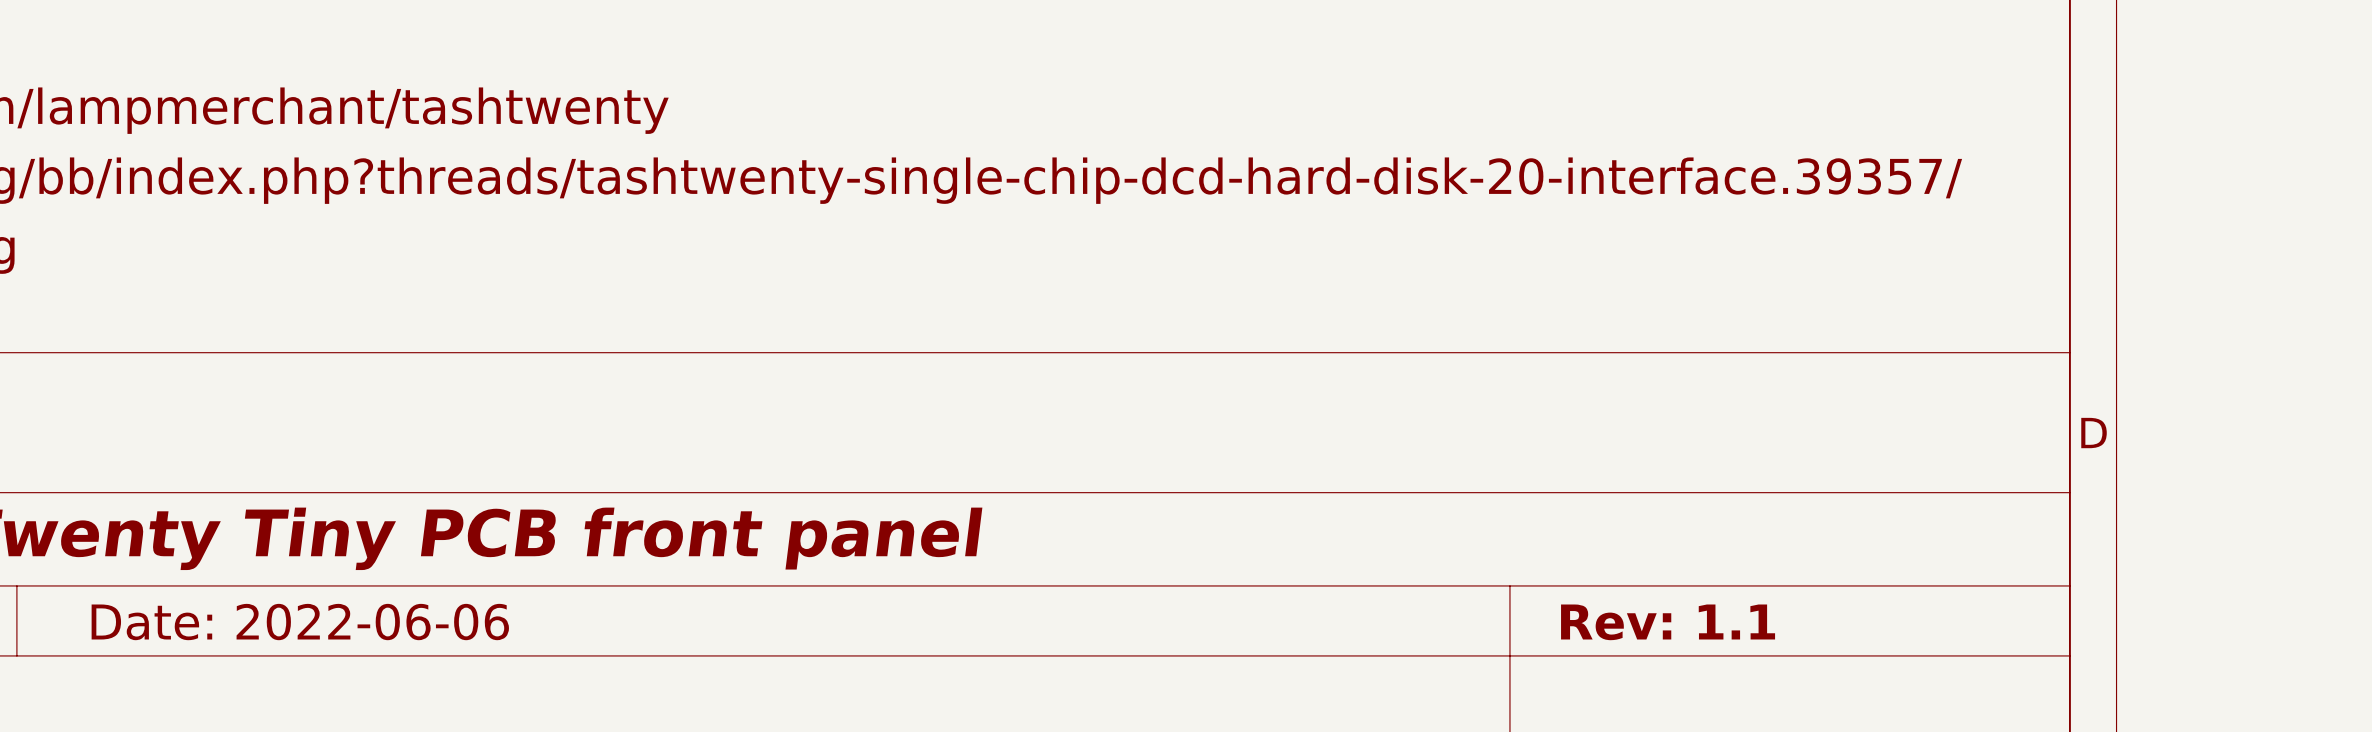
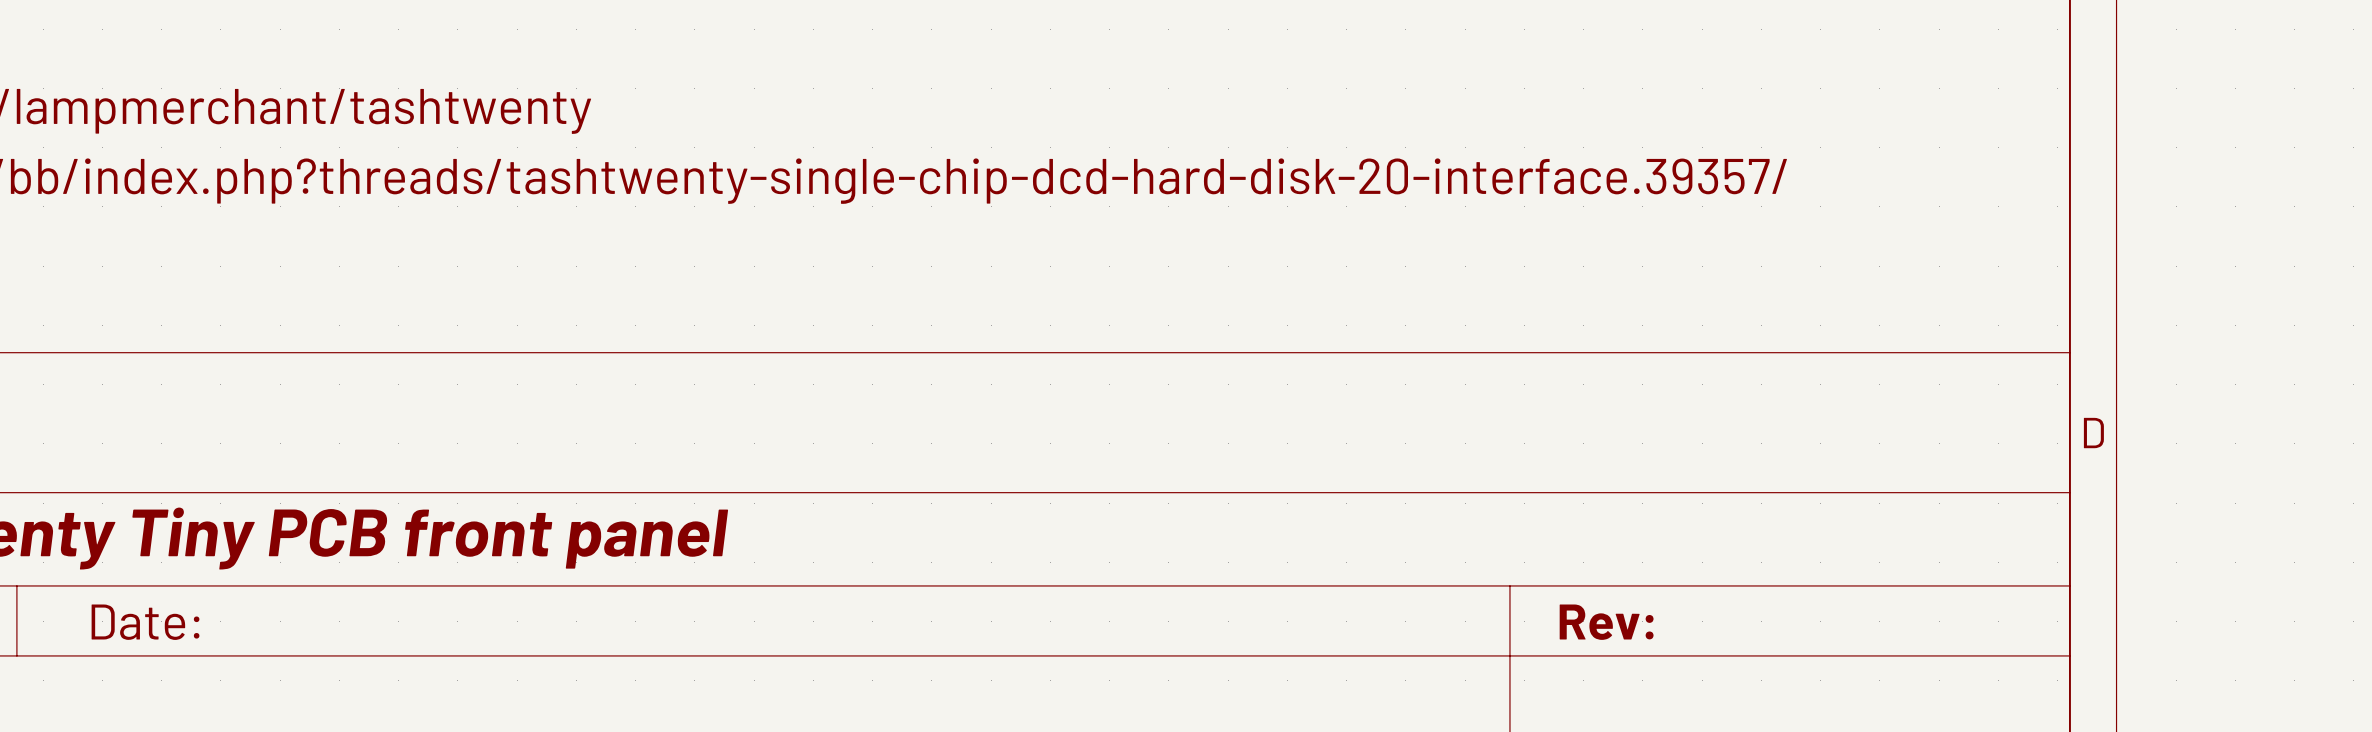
title block: Date: 2022-06-06 (300, 622) -> Date: (145, 622)
title block: Rev: 1.1 (1668, 622) -> Rev: (1606, 622)

